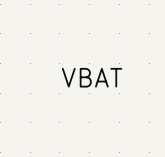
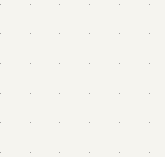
label: VBAT (92, 77) -> none

